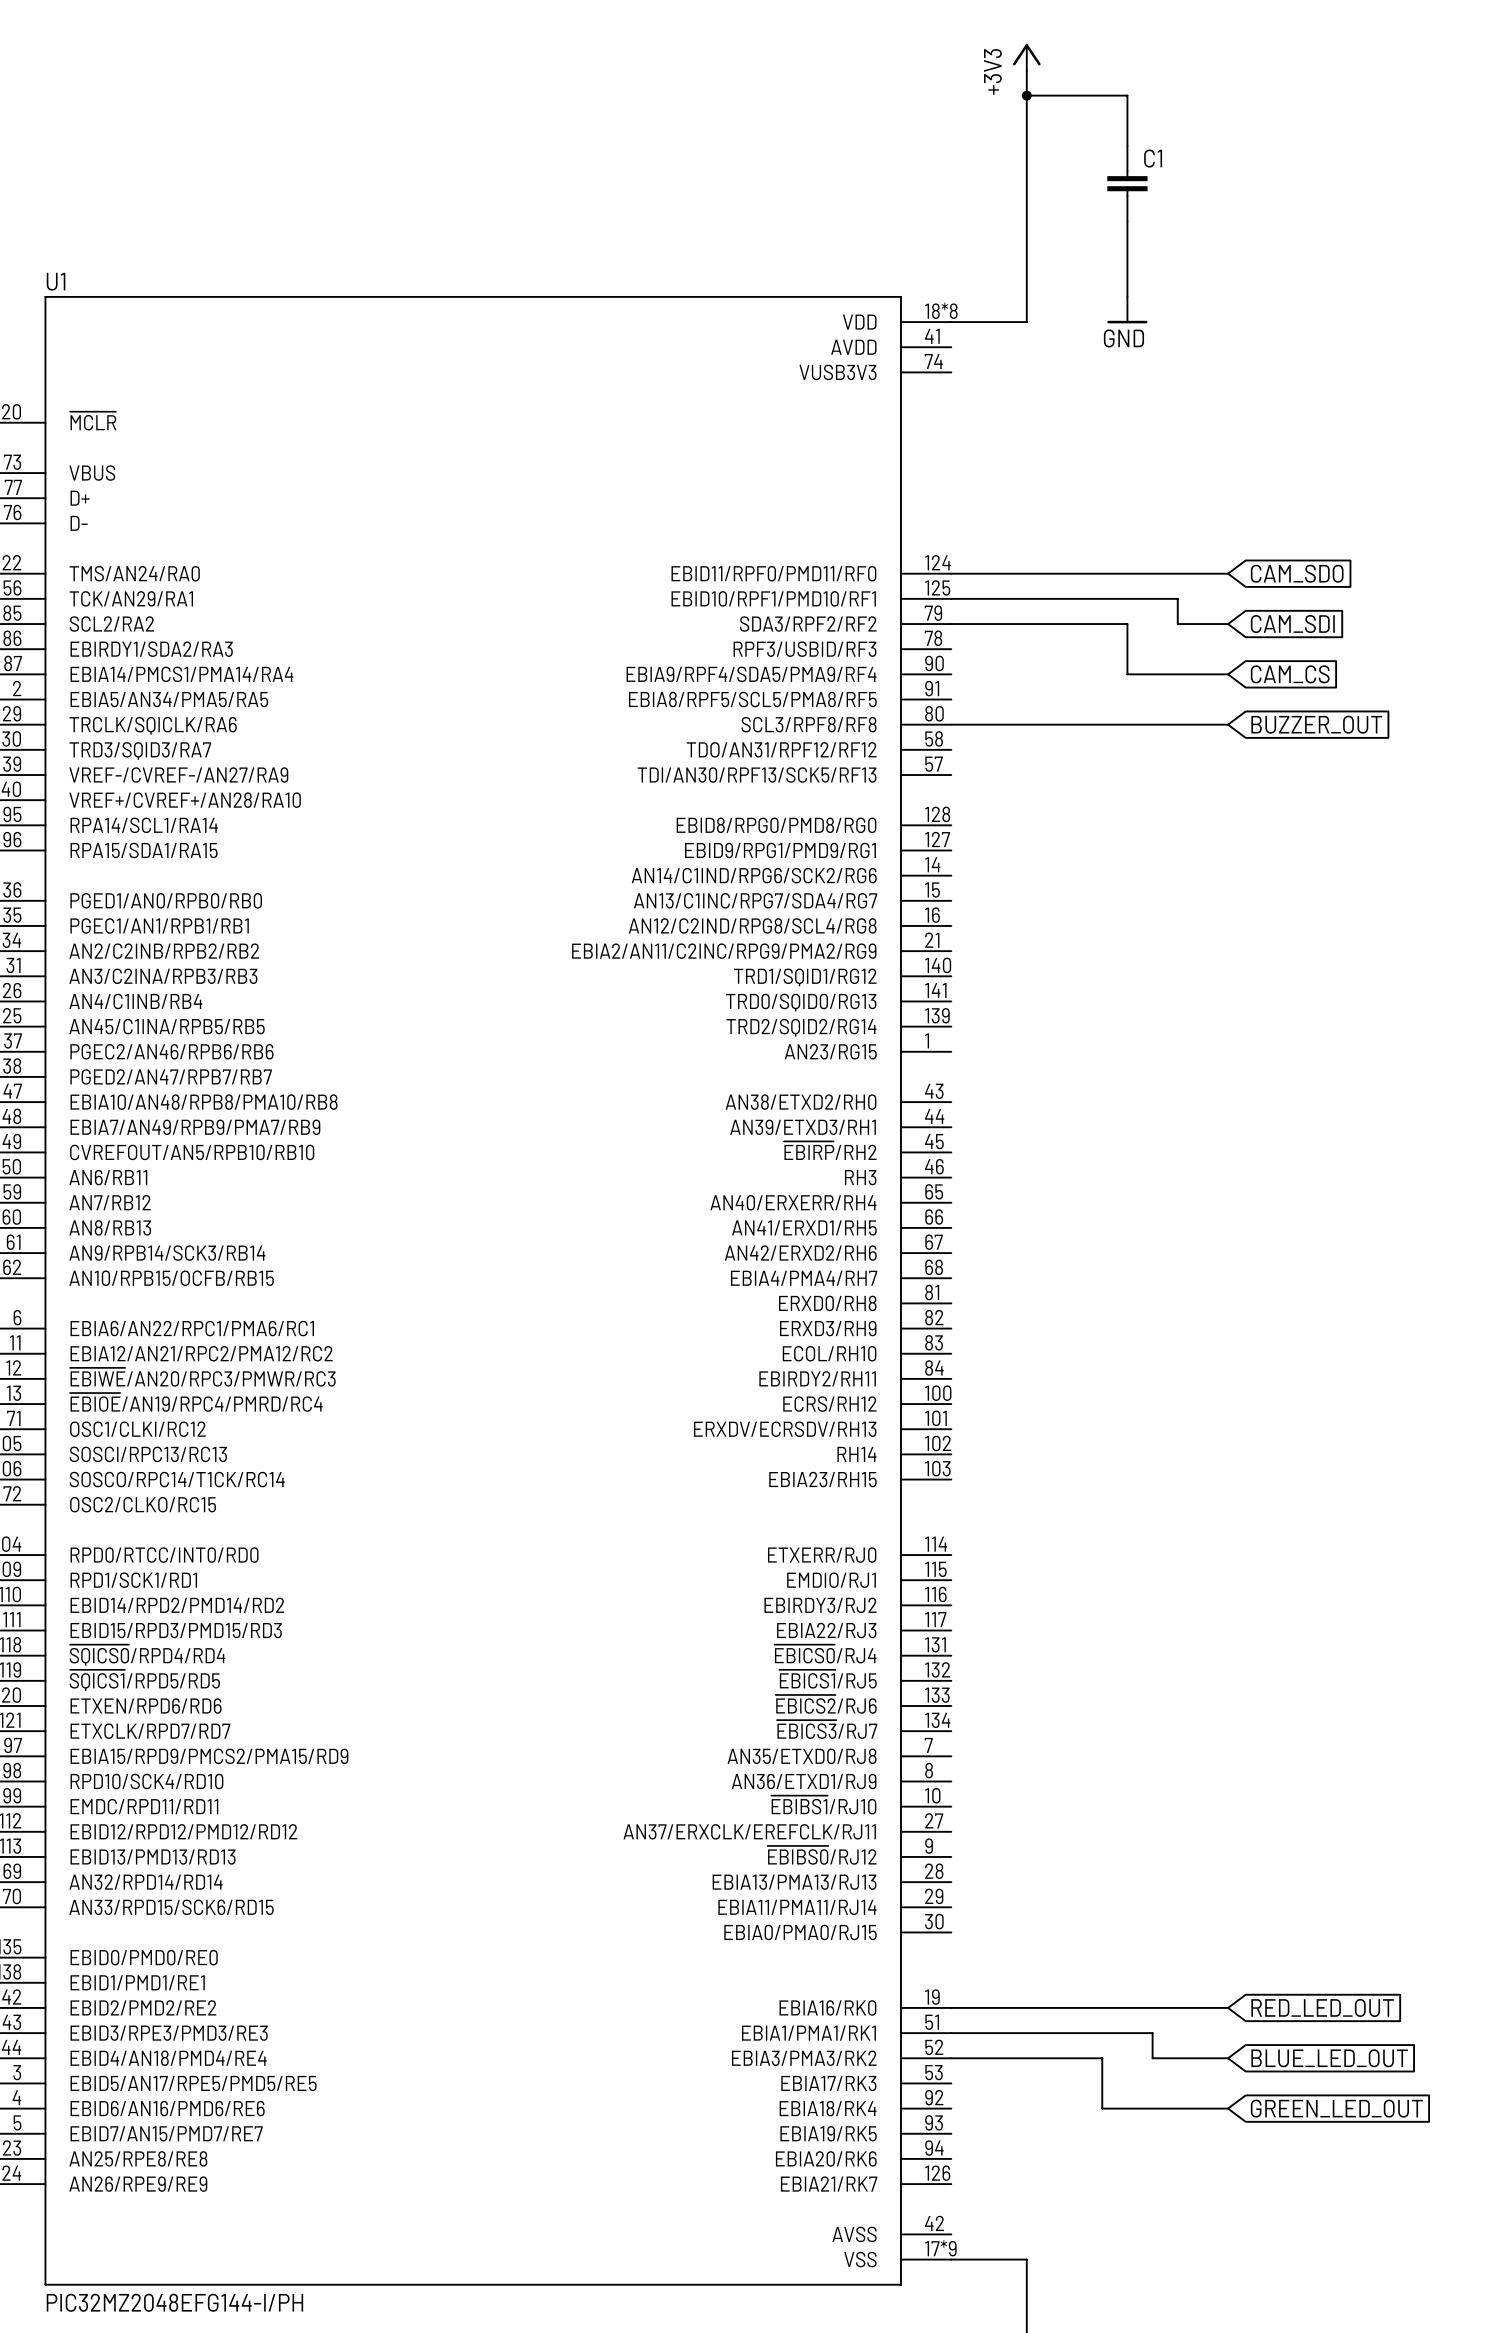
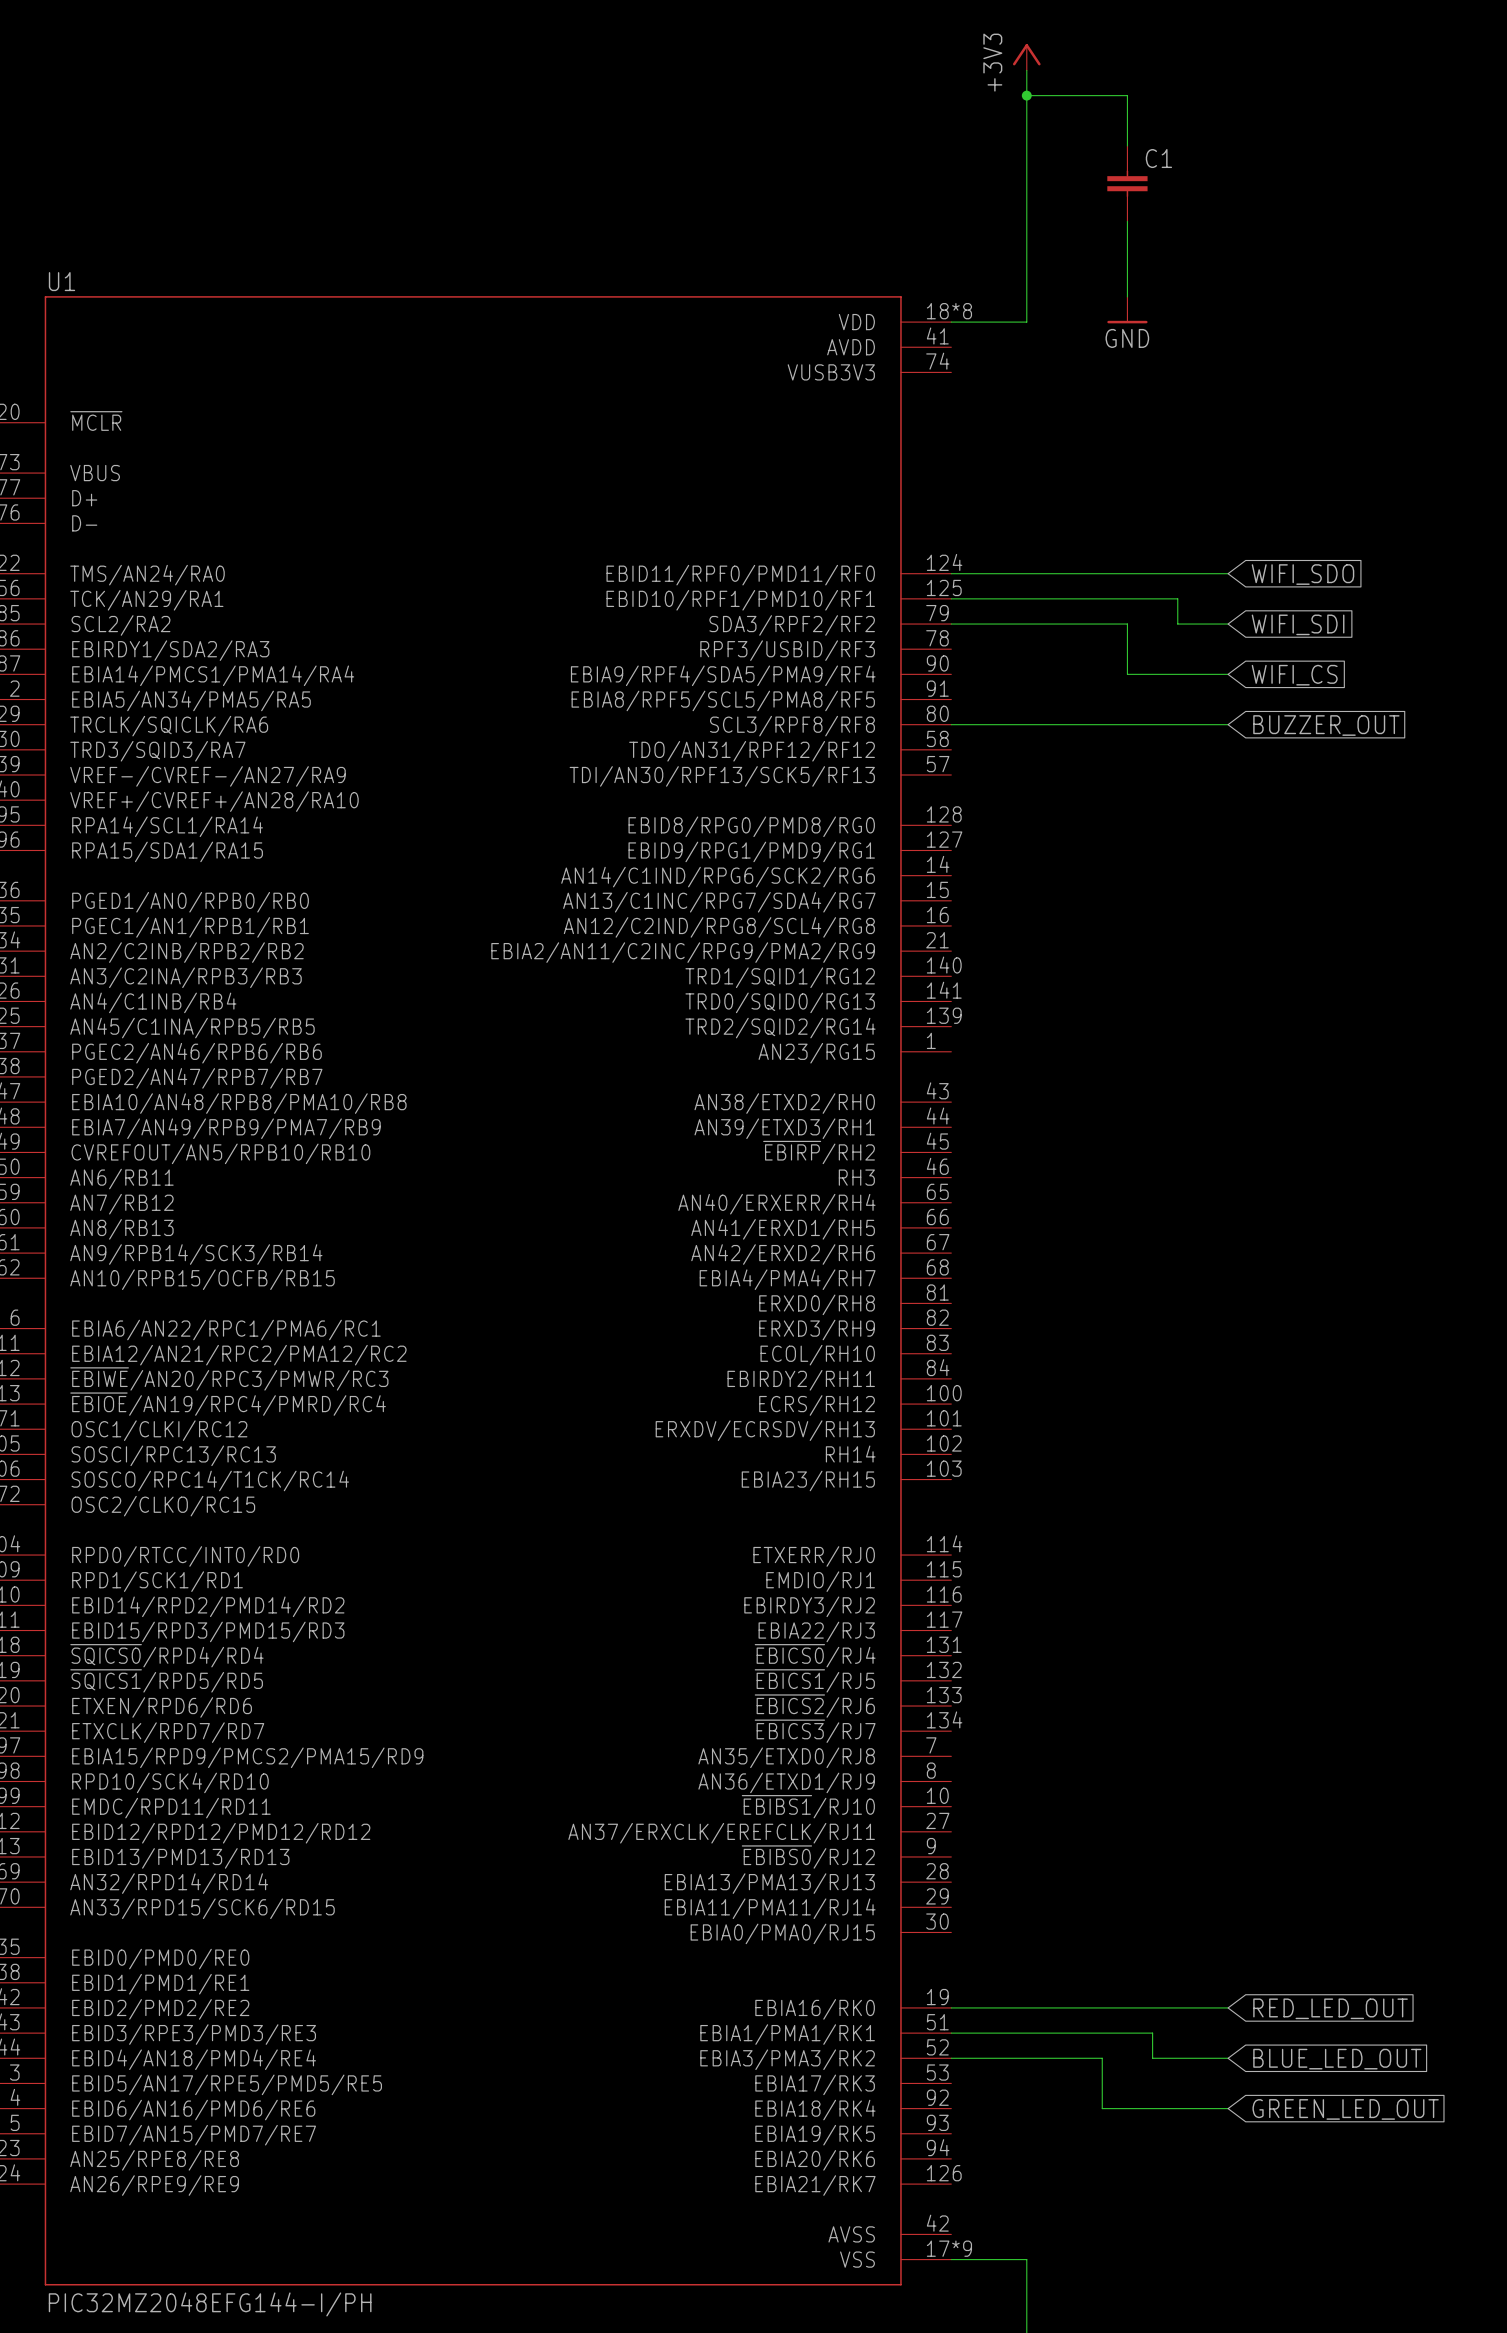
global label: CAM_SDO (1297, 573) -> WIFI_SDO (1302, 574)
global label: CAM_SDI (1292, 624) -> WIFI_SDI (1298, 624)
global label: CAM_CS (1290, 674) -> WIFI_CS (1294, 675)

